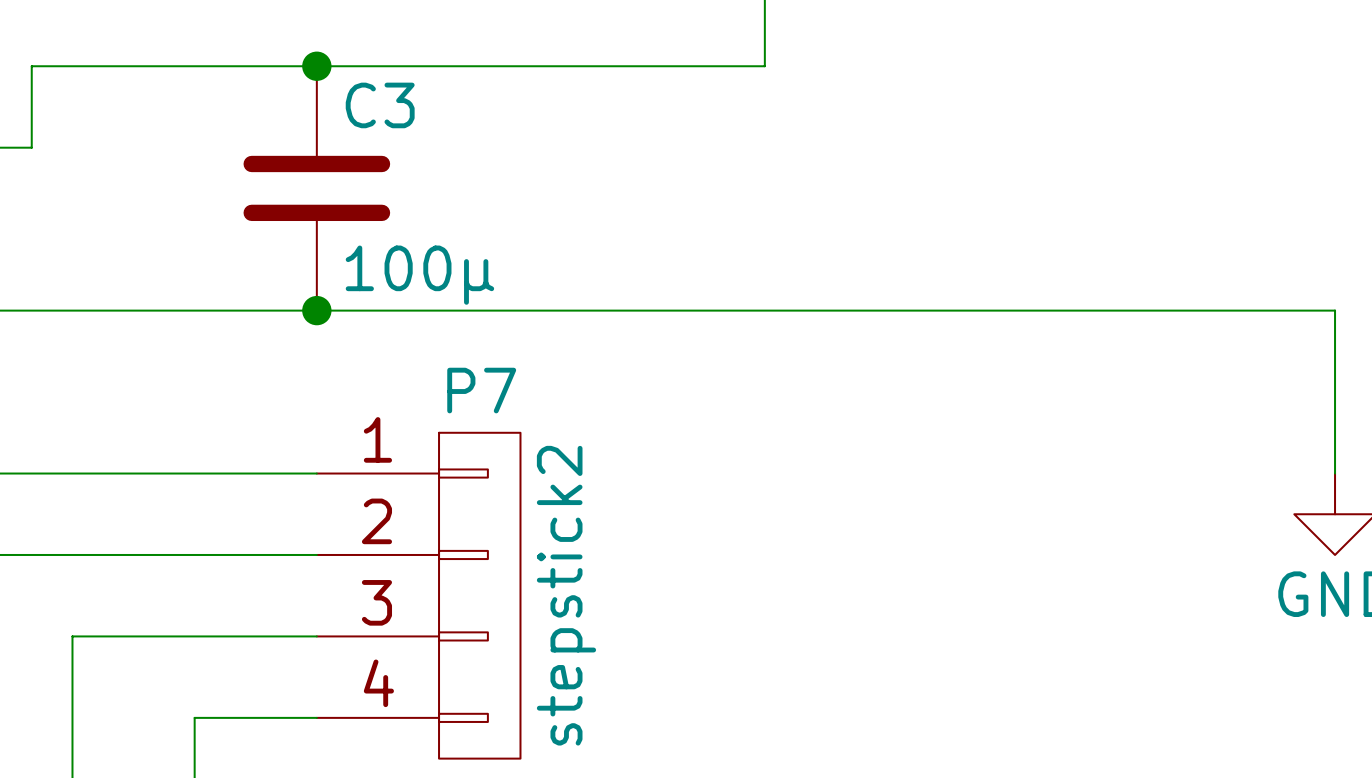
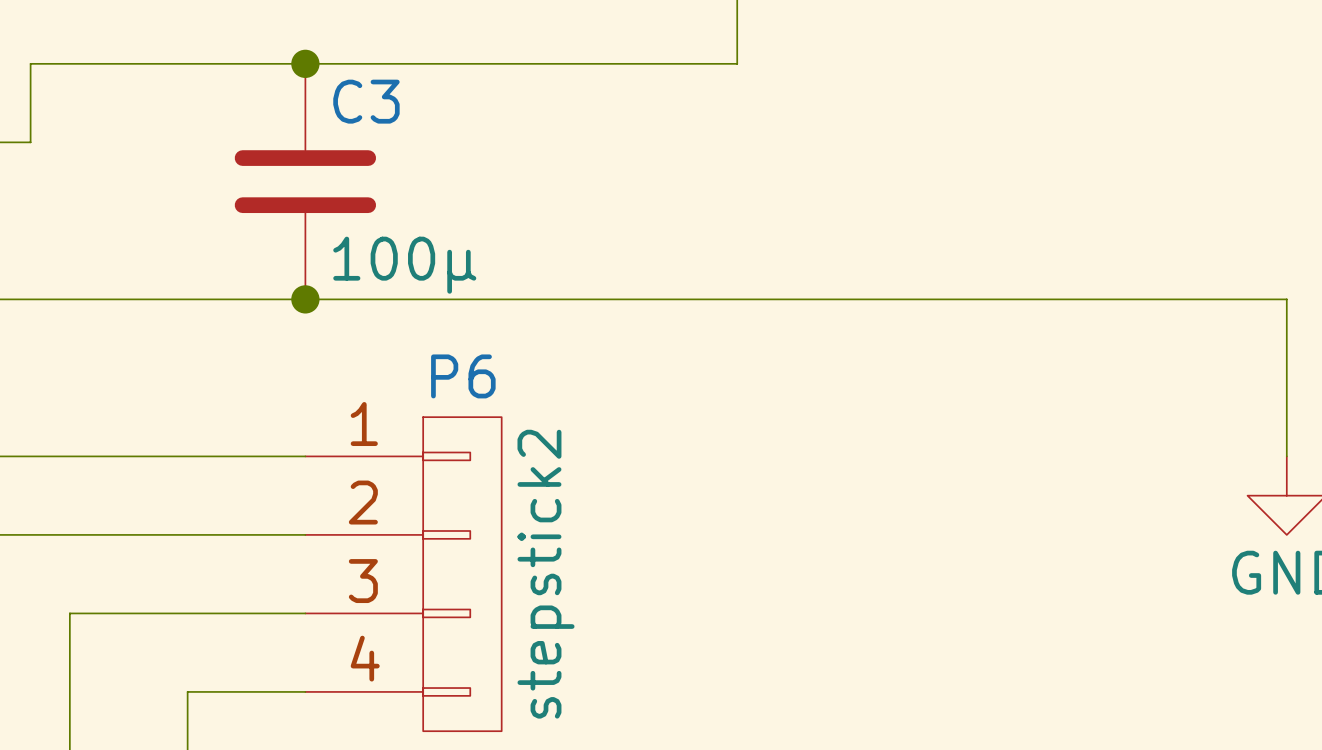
P7 name: P7 (481, 390) -> P6 (463, 376)

